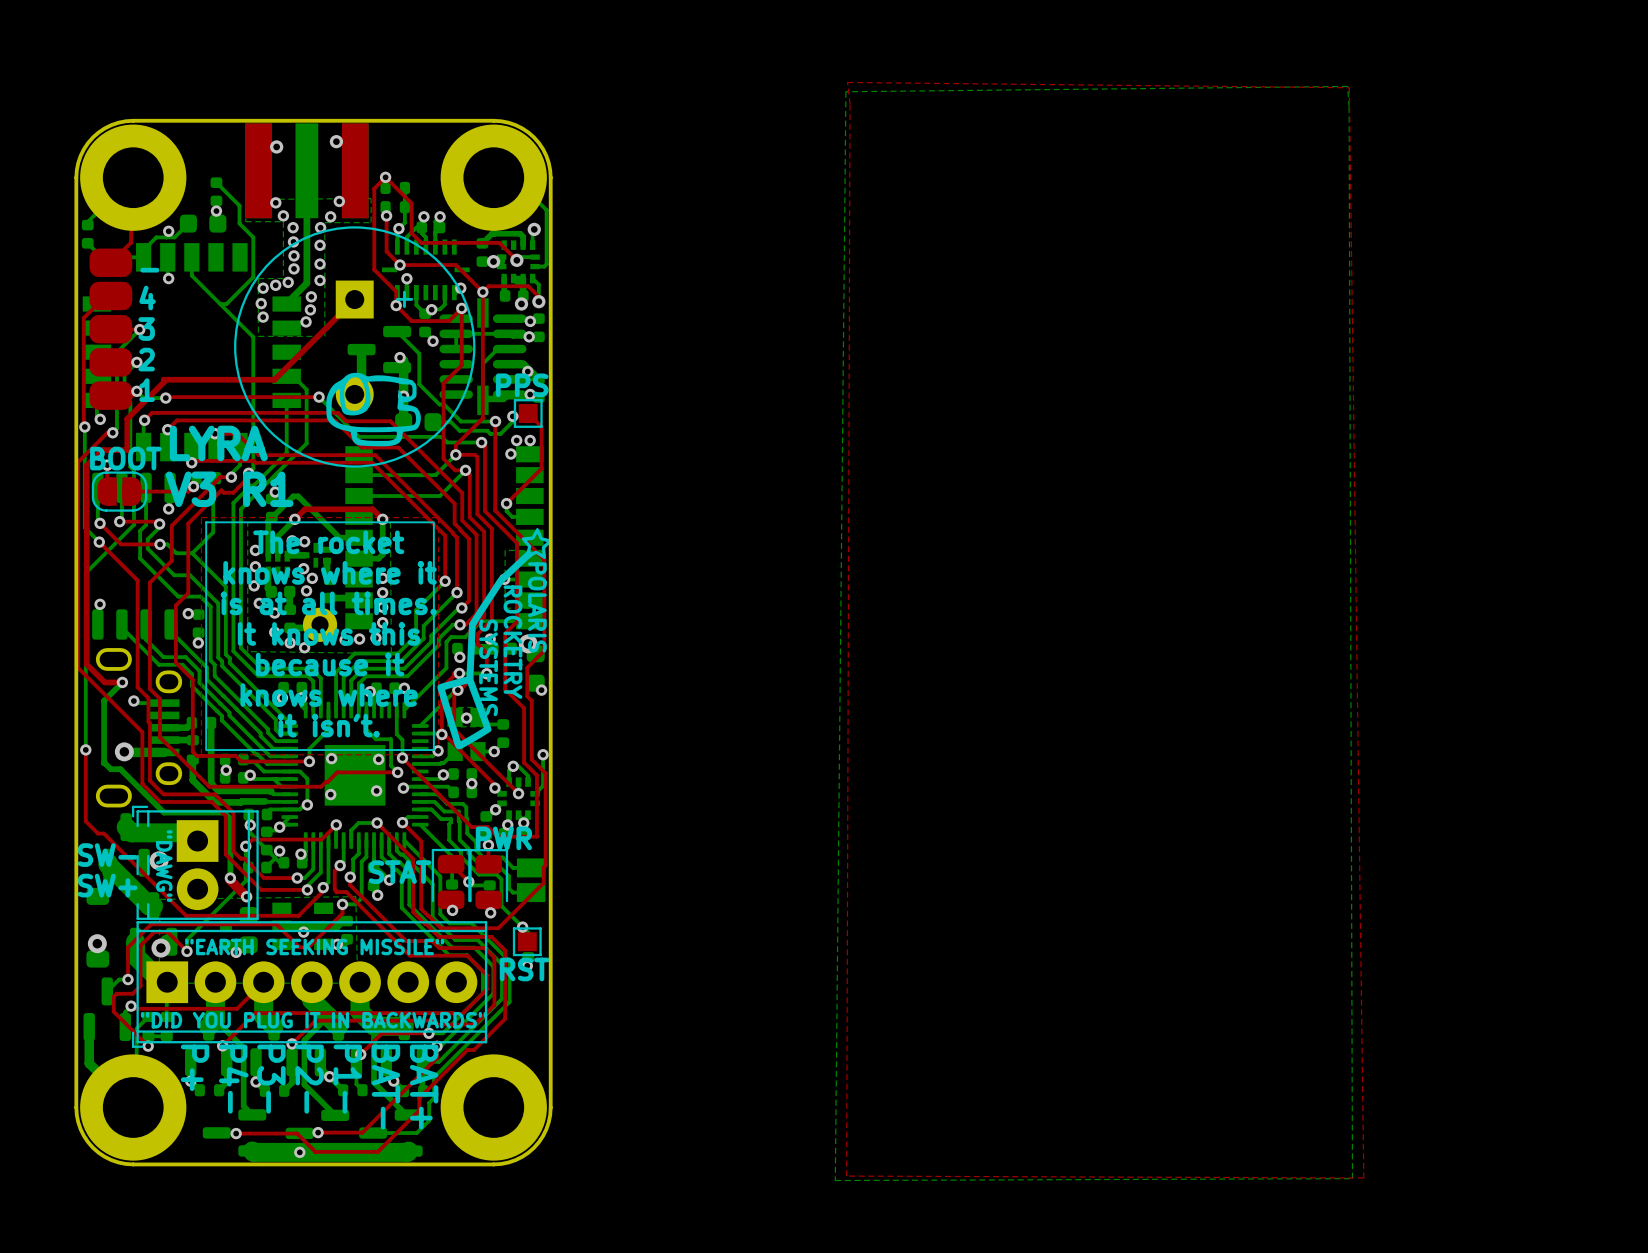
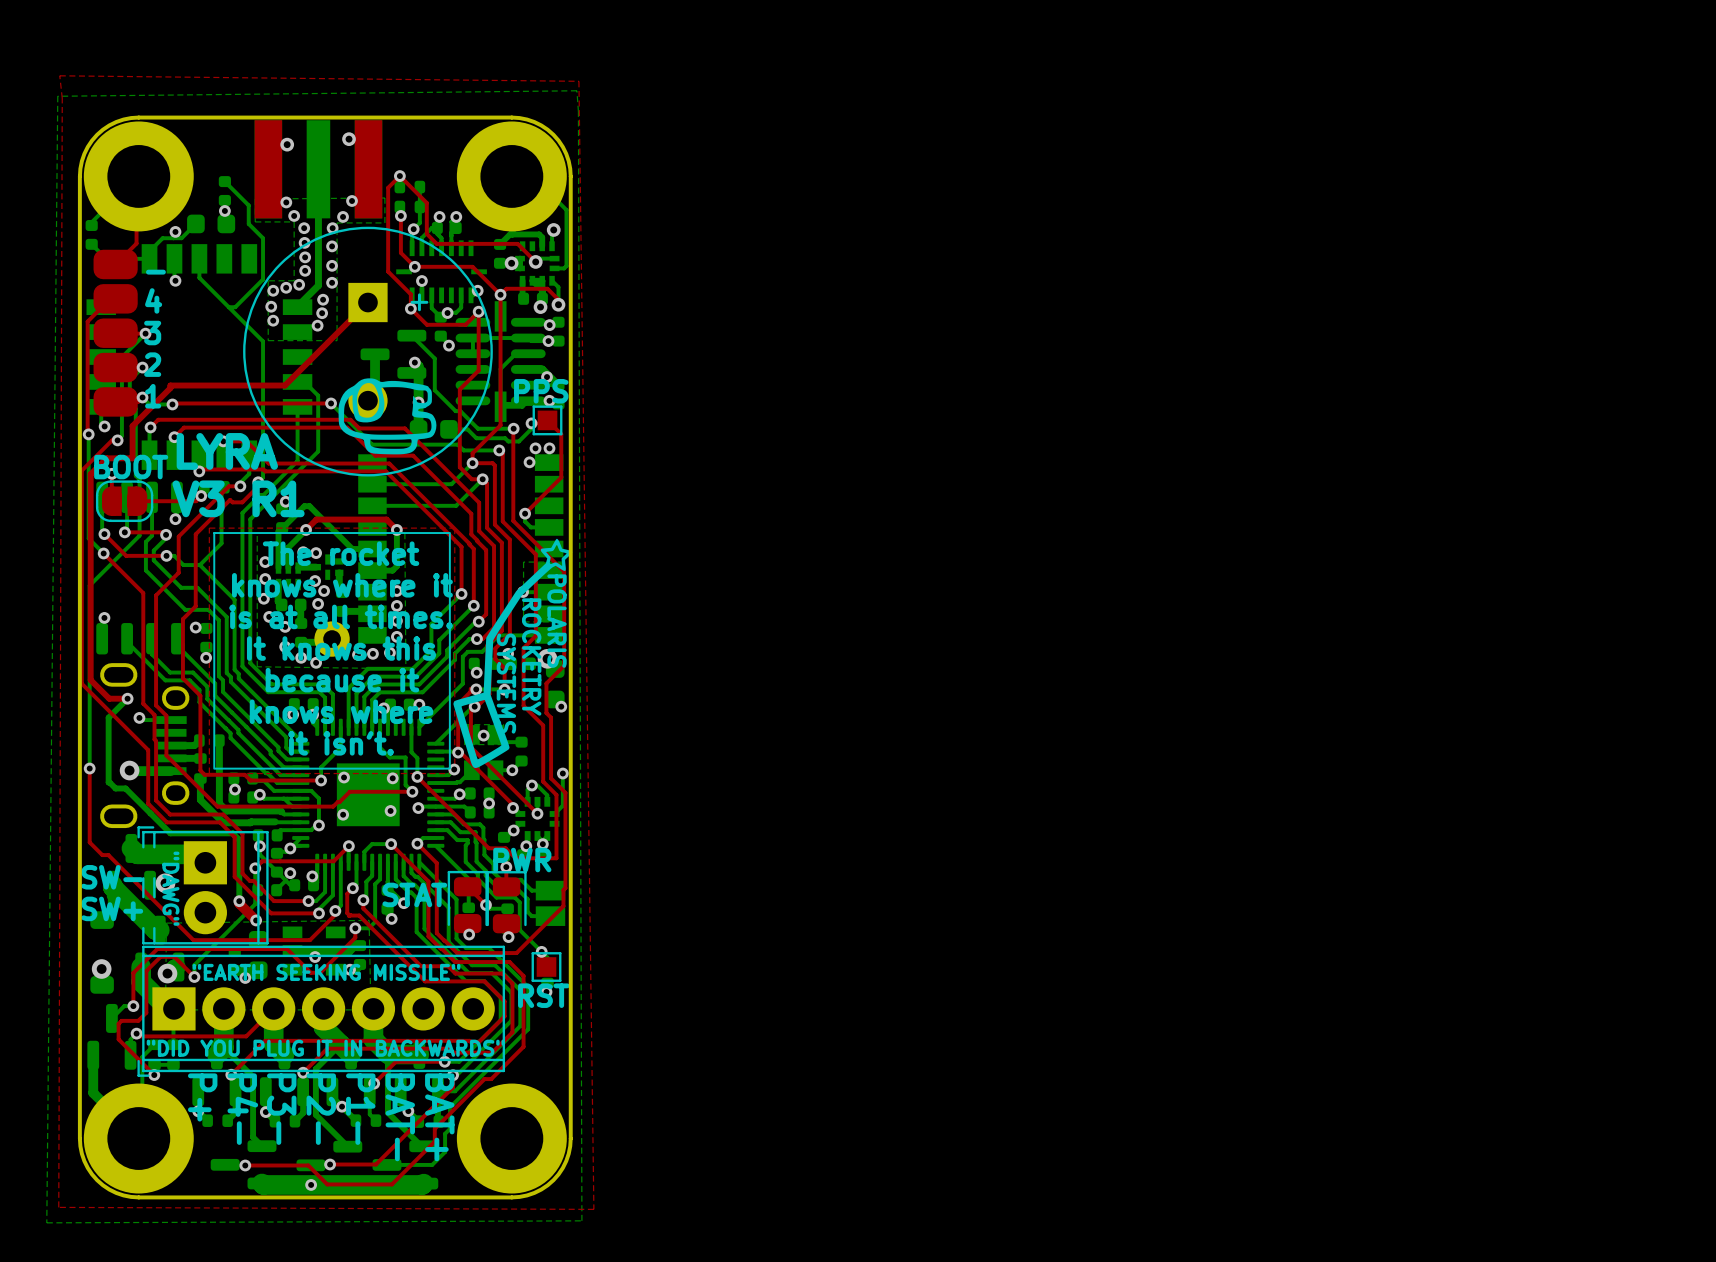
top zone outline: none -> (59, 75) (578, 81) (593, 1209) (58, 1207) (62, 98) (59, 75)
top zone outline: (847, 82) (1349, 87) (1363, 1177) (846, 1176) (850, 104) (847, 82) -> none
bottom zone outline: (1347, 86) (845, 91) (835, 1180) (1352, 1178) (1347, 86) -> none
bottom zone outline: none -> (576, 90) (57, 96) (46, 1222) (581, 1220) (576, 90)

